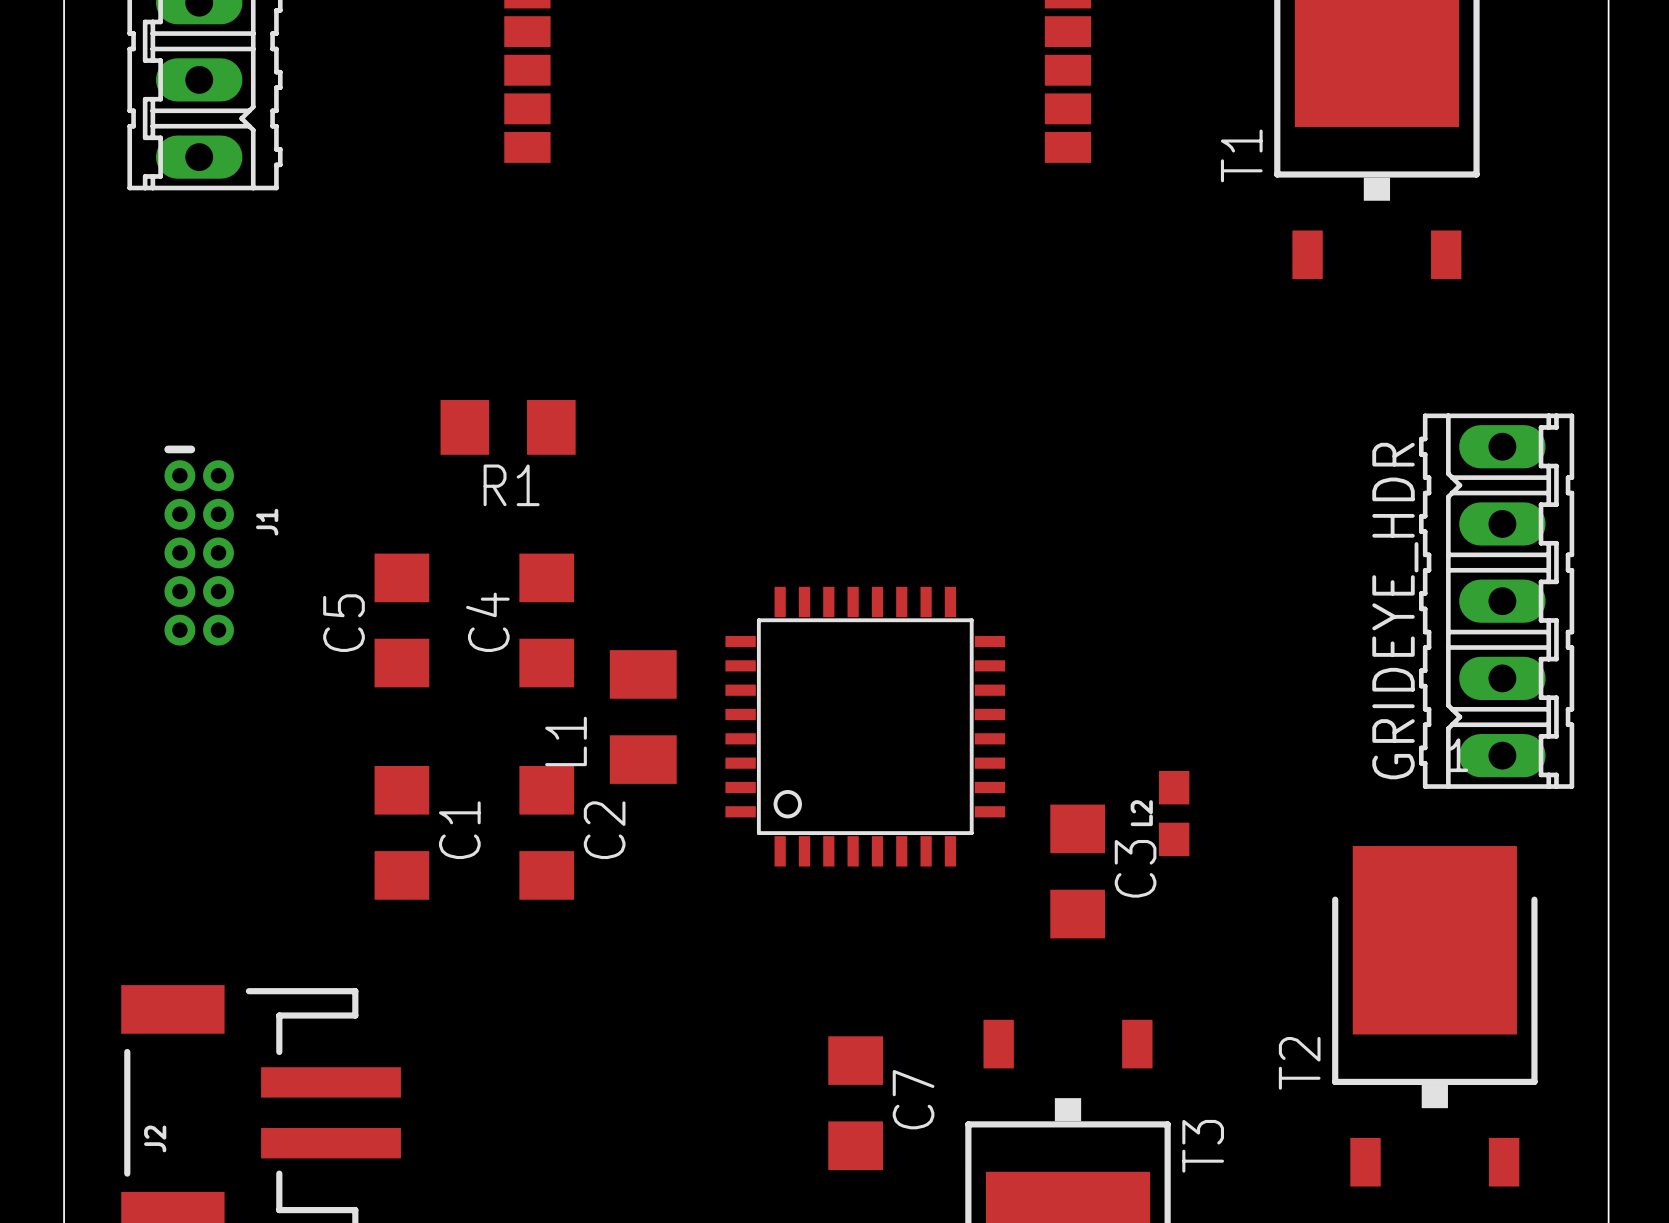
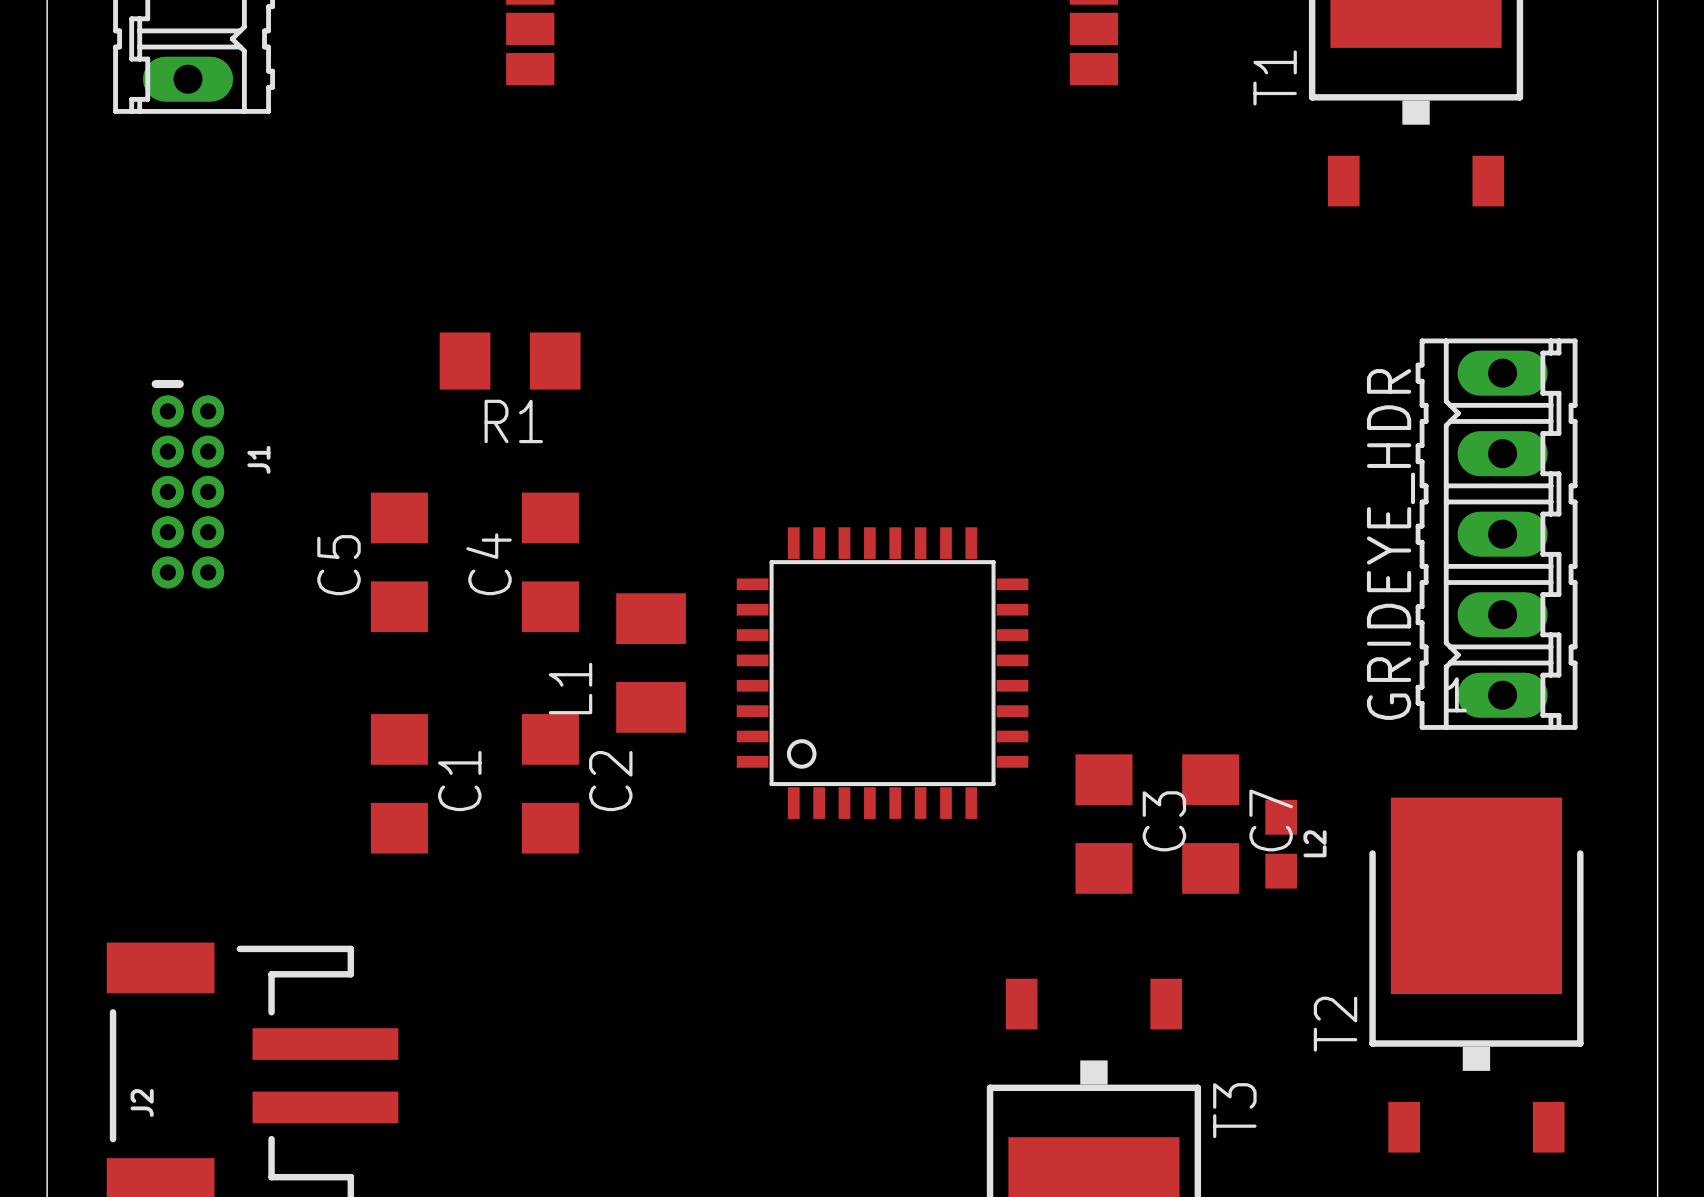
GRIDEYE_HDR position: (1496, 601) -> (1496, 534)
L2 name position: L2 (1141, 813) -> L2 (1314, 843)
L2 position: (1174, 813) -> (1281, 844)
C7 position: (855, 1103) -> (1210, 824)

